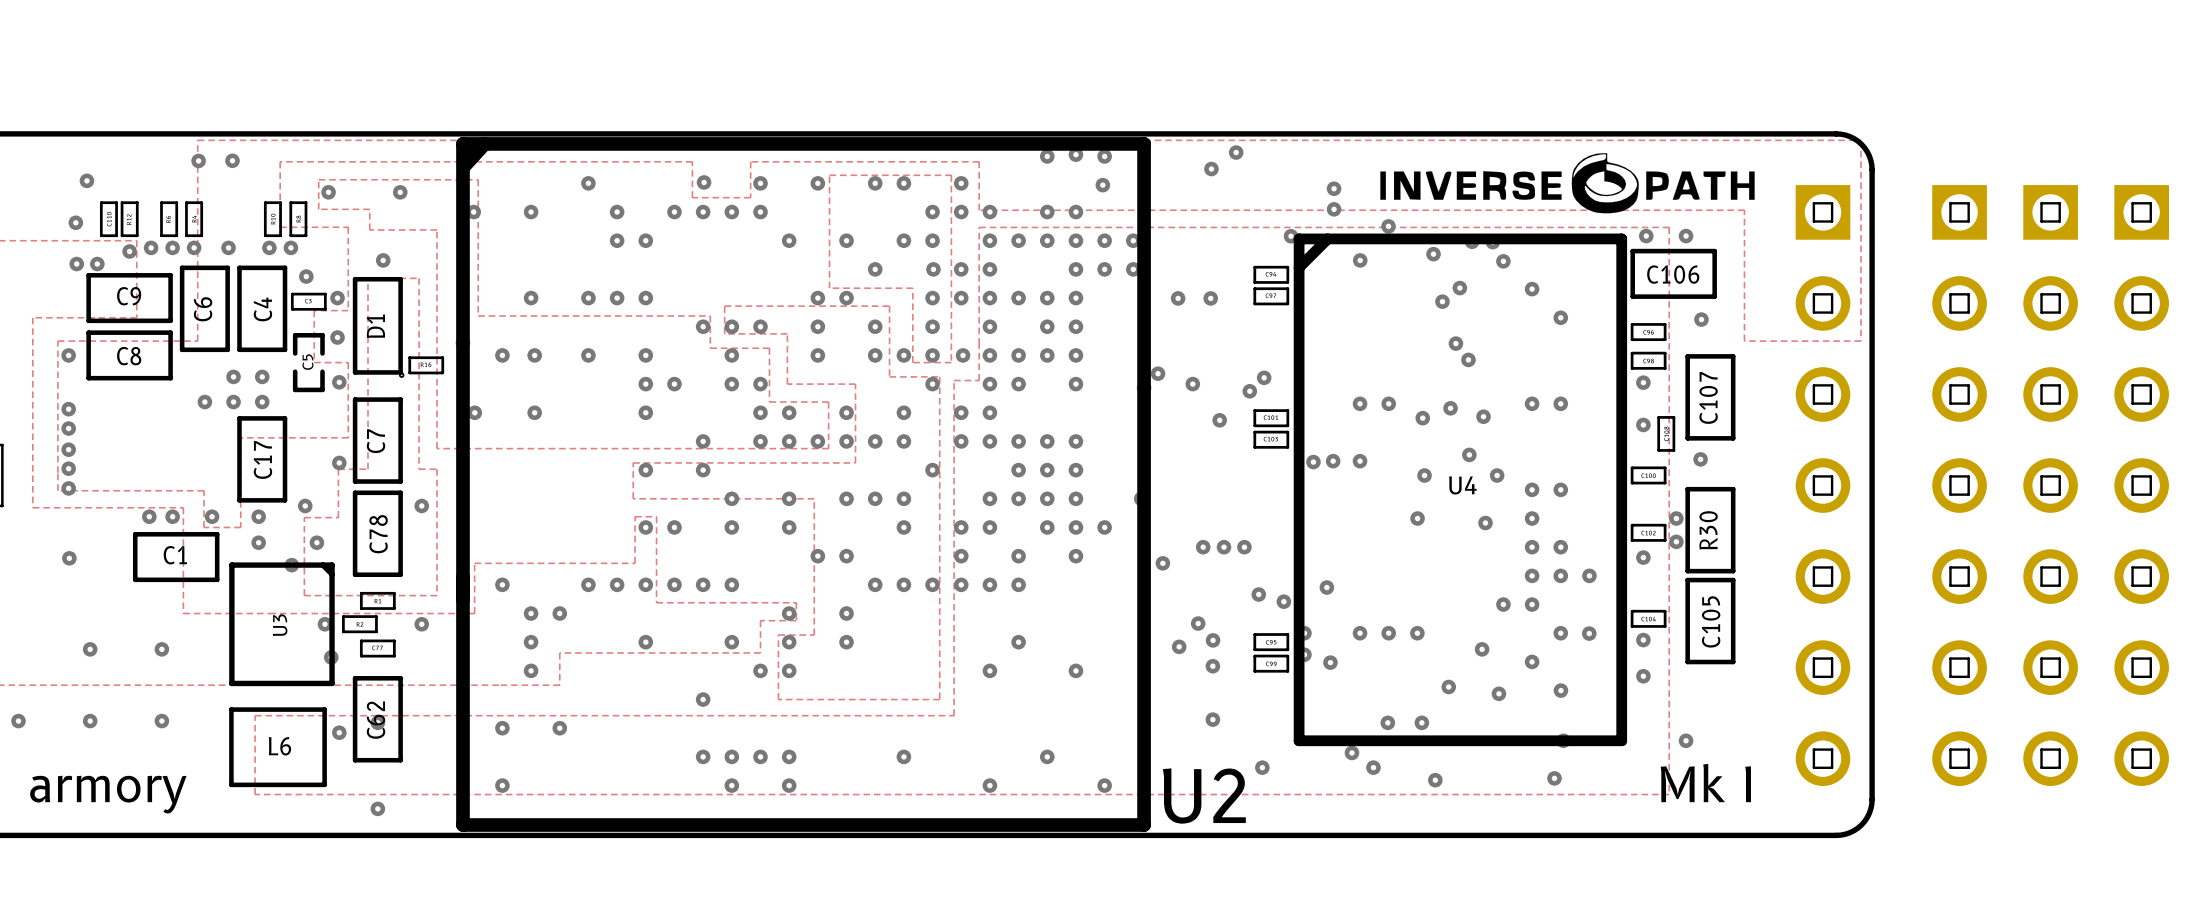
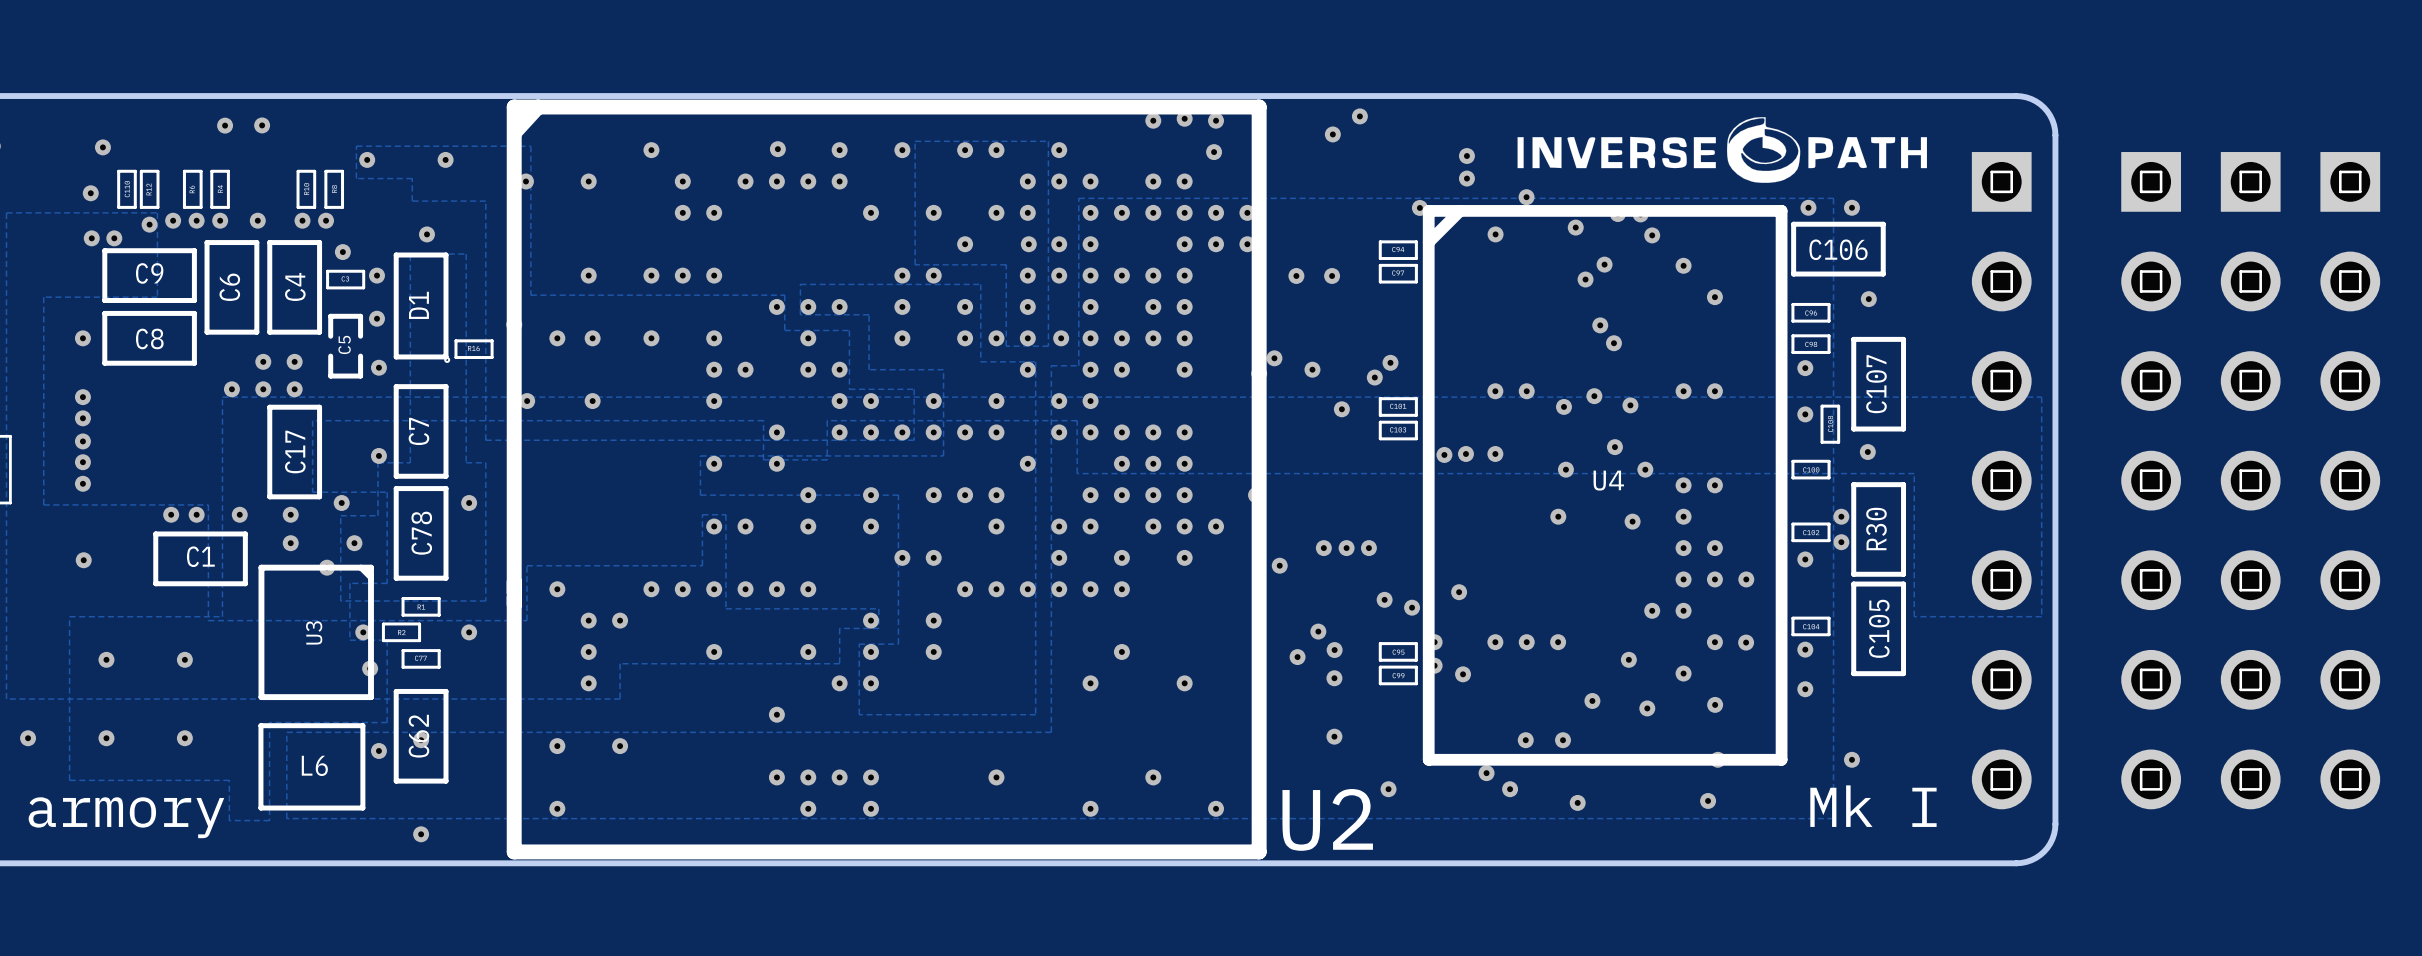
zone outline: (197, 140) (197, 341) (57, 341) (57, 490) (203, 490) (203, 527) (240, 527) (240, 437) (348, 437) (348, 362) (314, 362) (314, 310) (348, 310) (348, 227) (280, 227) (280, 161) (692, 161) (692, 197) (750, 197) (750, 161) (979, 161) (979, 210) (1744, 210) (1744, 341) (1860, 341) (1860, 140) (197, 140) -> (222, 397) (222, 616) (69, 616) (69, 780) (229, 780) (229, 820) (269, 820) (269, 722) (387, 722) (387, 640) (349, 640) (349, 583) (387, 583) (387, 492) (312, 492) (312, 420) (763, 420) (763, 459) (827, 459) (827, 420) (1077, 420) (1077, 473) (1914, 473) (1914, 616) (2041, 616) (2041, 397) (222, 397)

